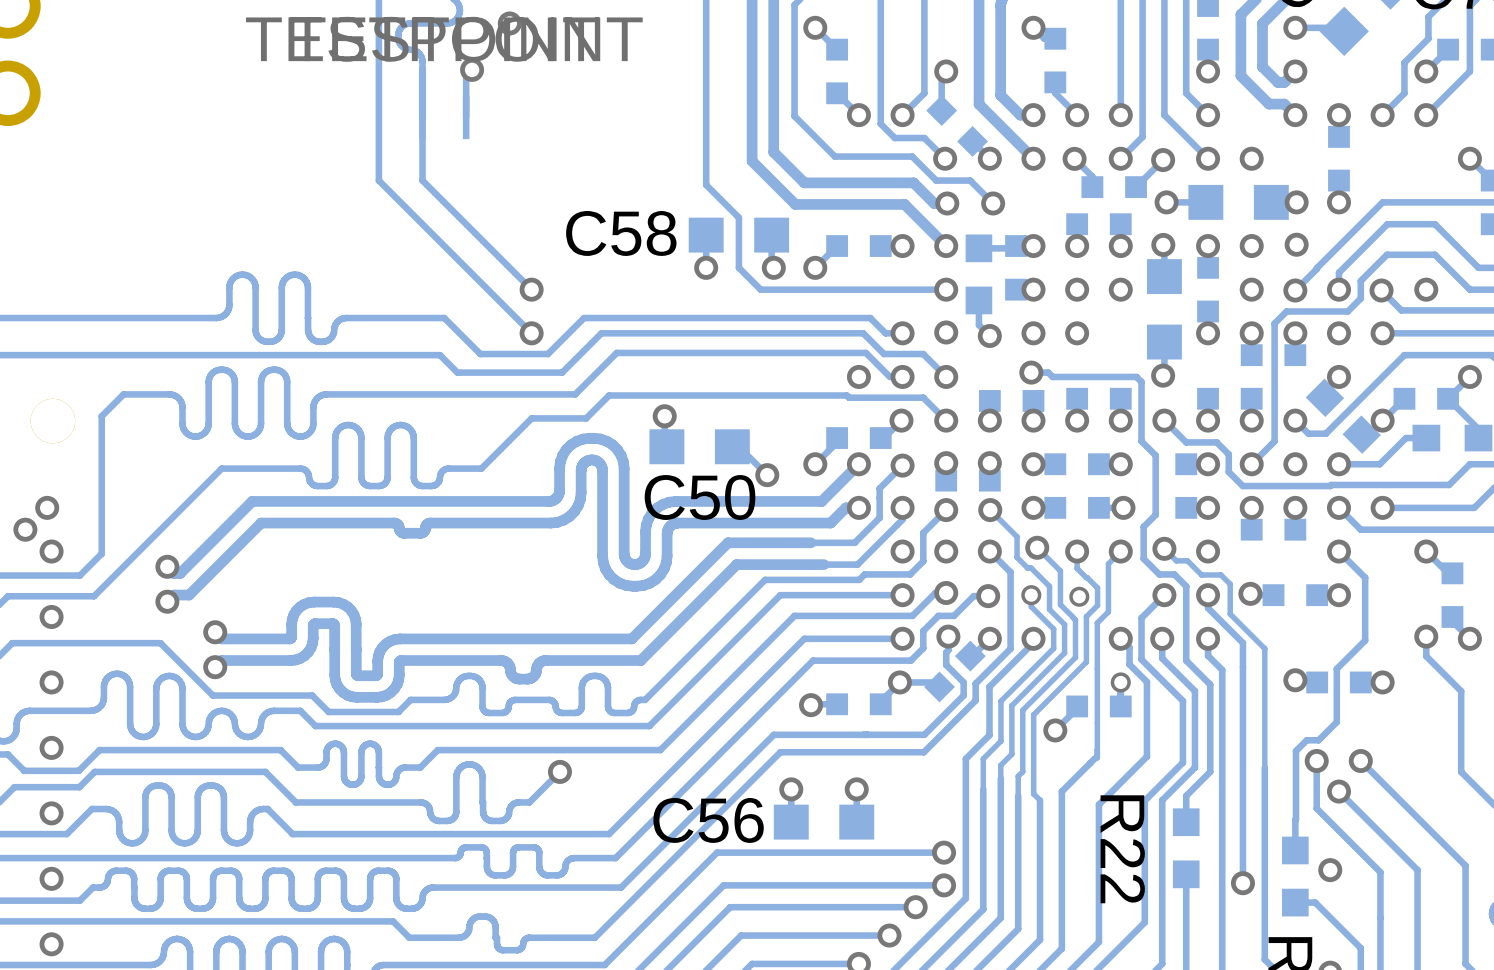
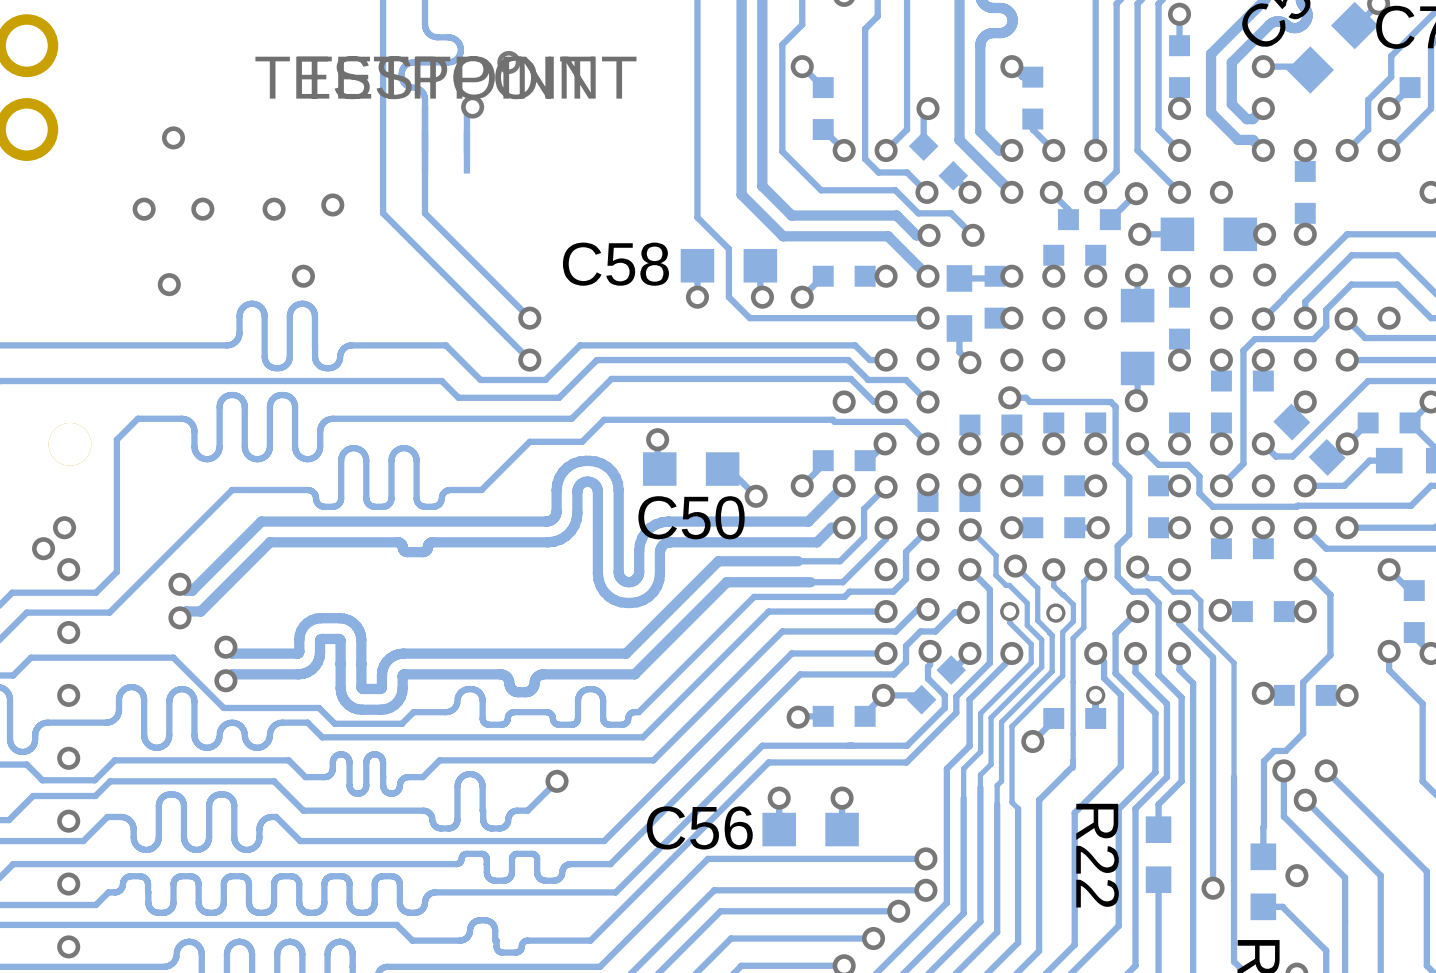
via: none -> (173, 137)
via: none -> (332, 204)
via: none -> (144, 209)
via: none -> (202, 209)
via: none -> (274, 209)
via: none -> (303, 276)
via: none -> (169, 284)

